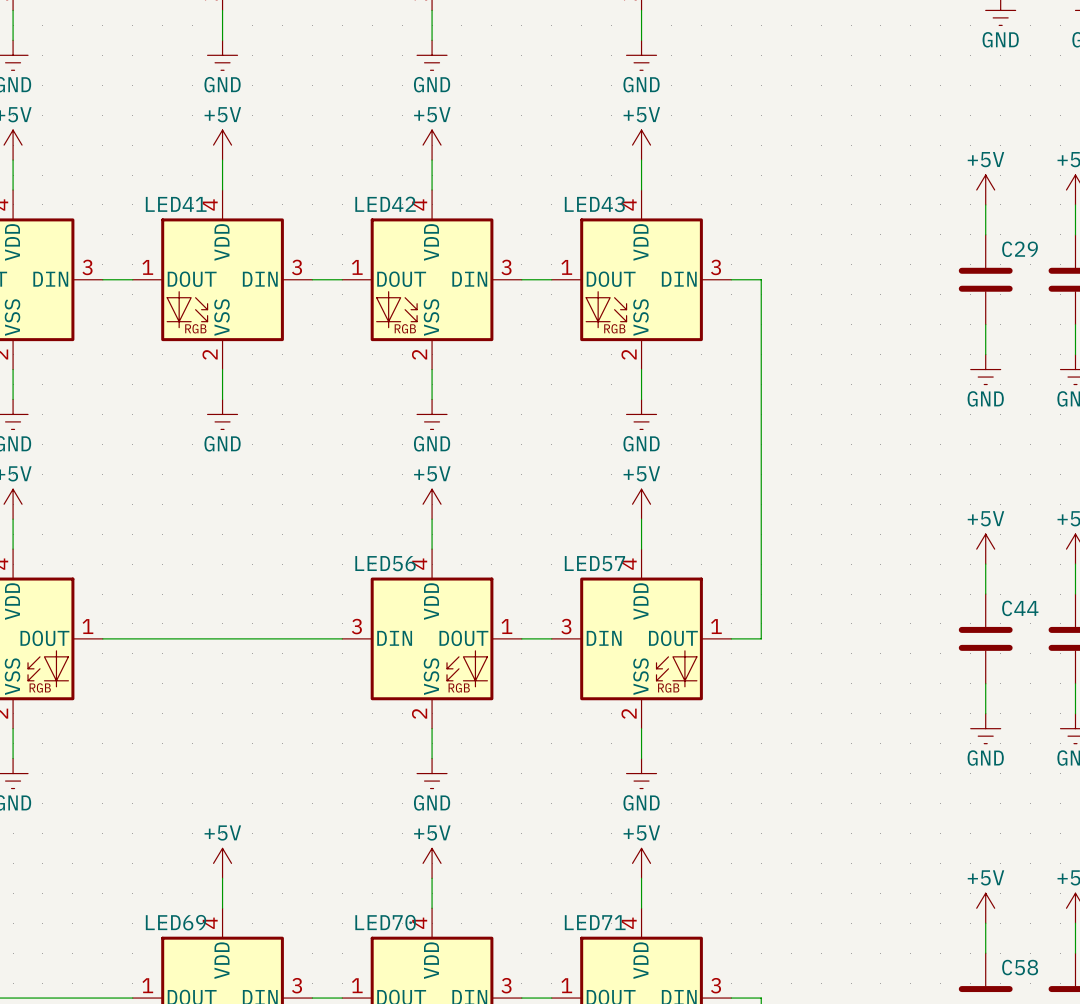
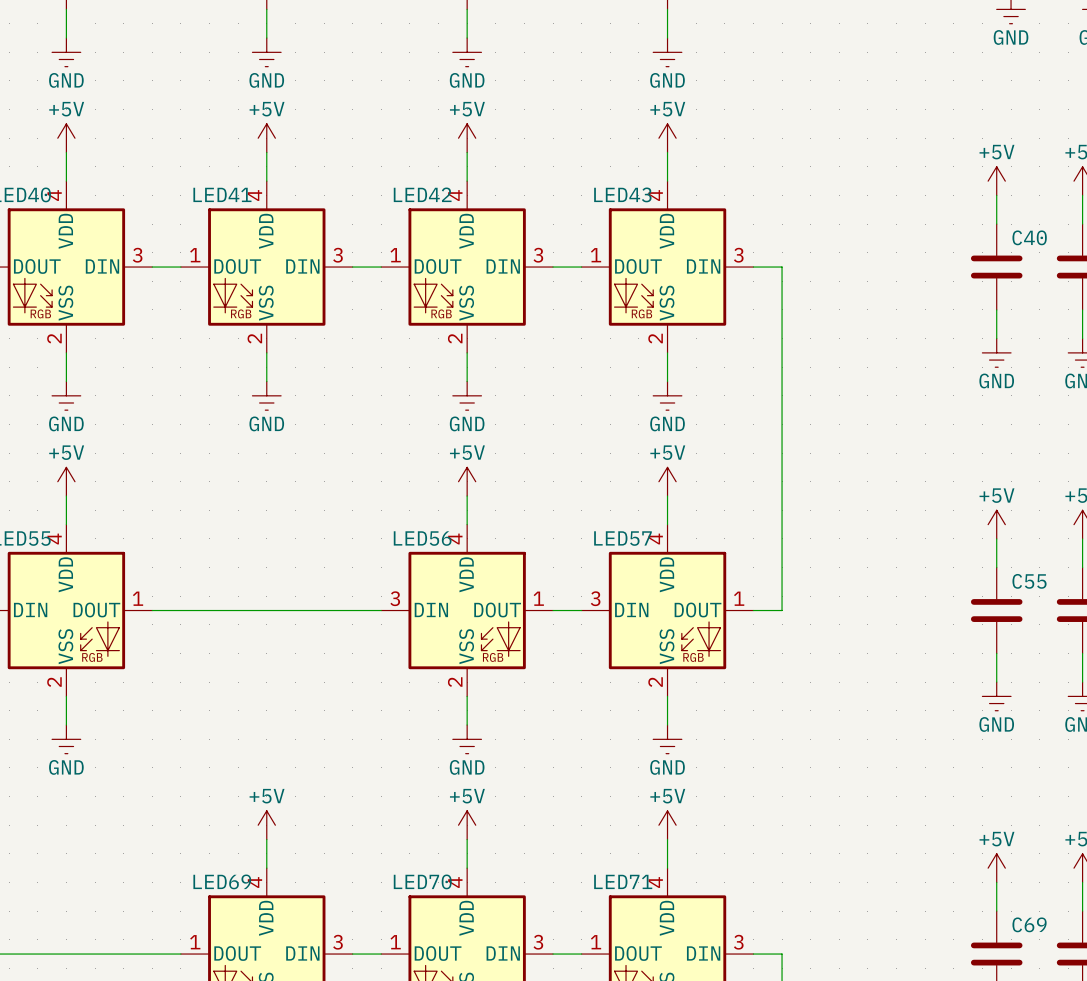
C29 name: C29 (1020, 249) -> C40 (1029, 237)
C44 name: C44 (1020, 608) -> C55 (1029, 581)
C58 name: C58 (1020, 967) -> C69 (1029, 924)

